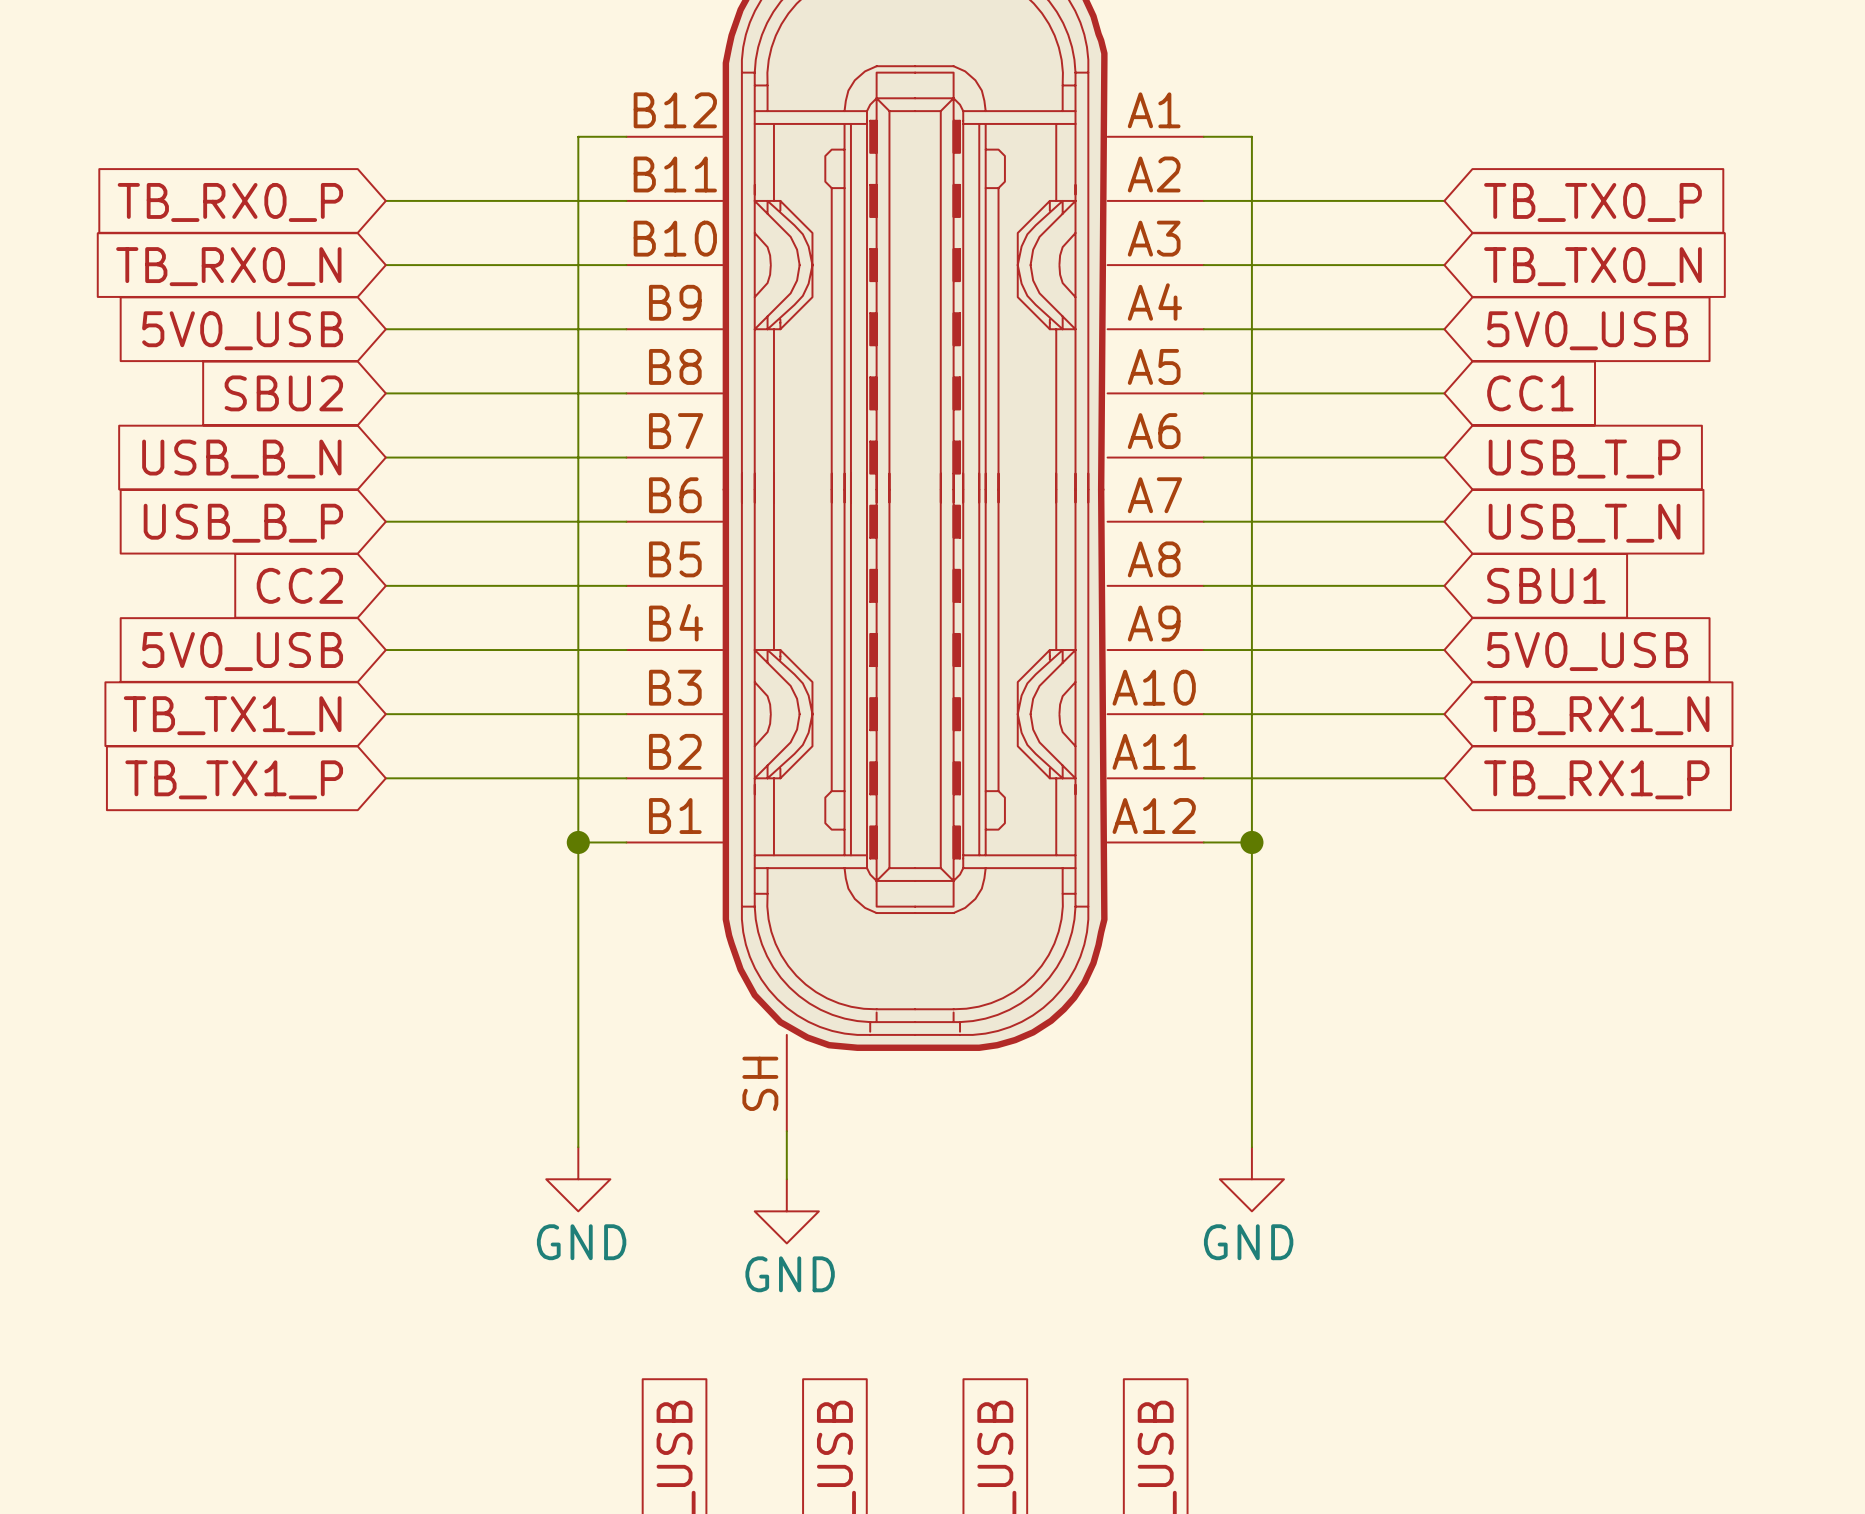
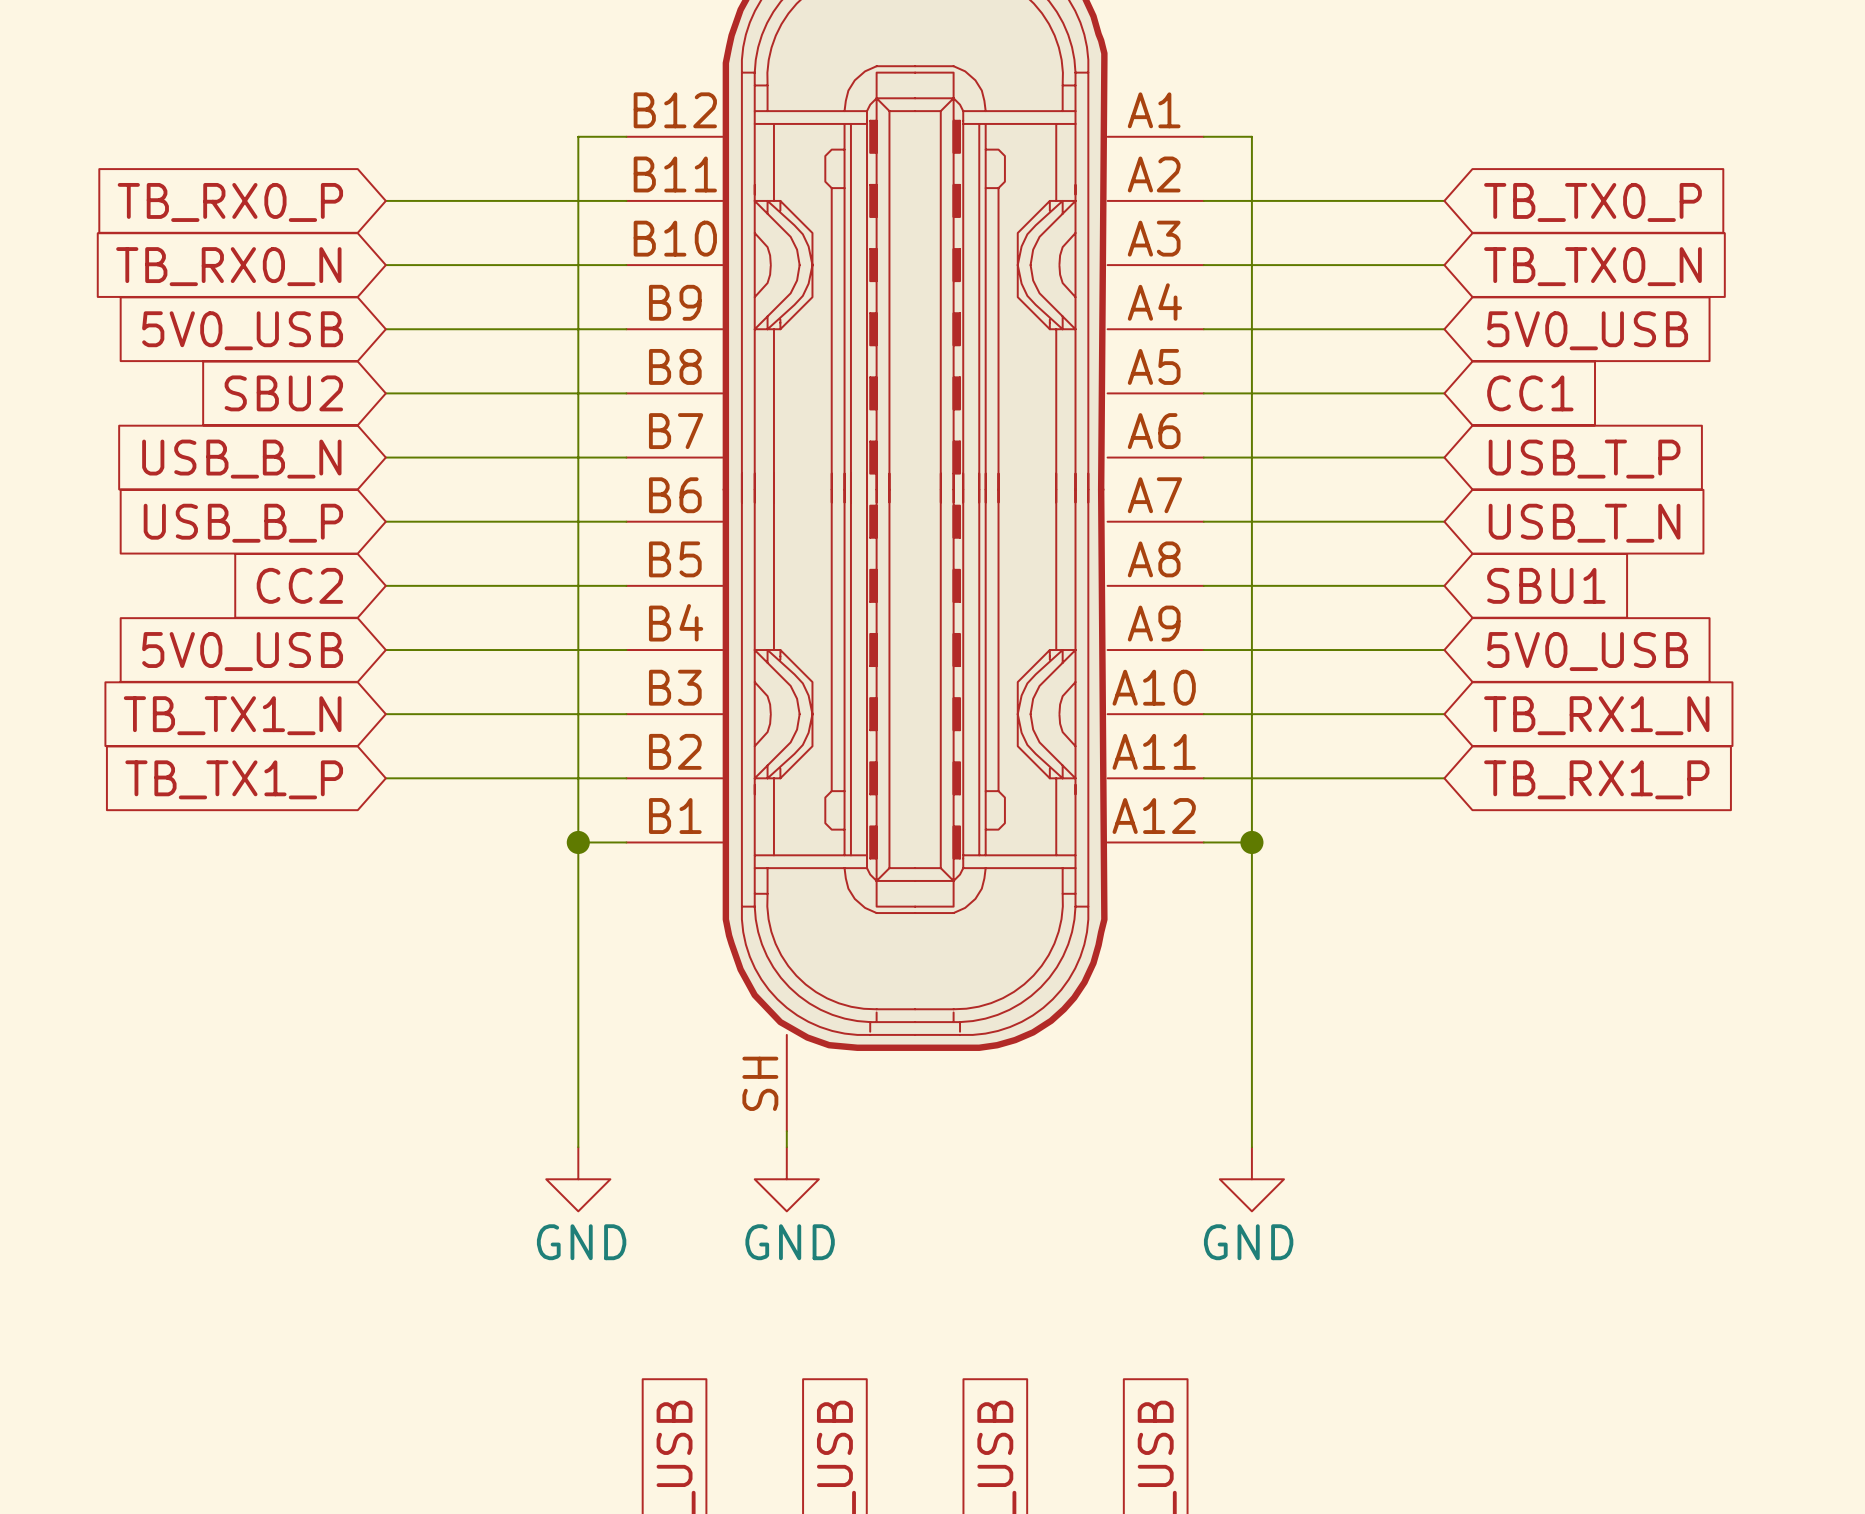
power symbol position: GND (786, 1211) -> GND (786, 1179)

